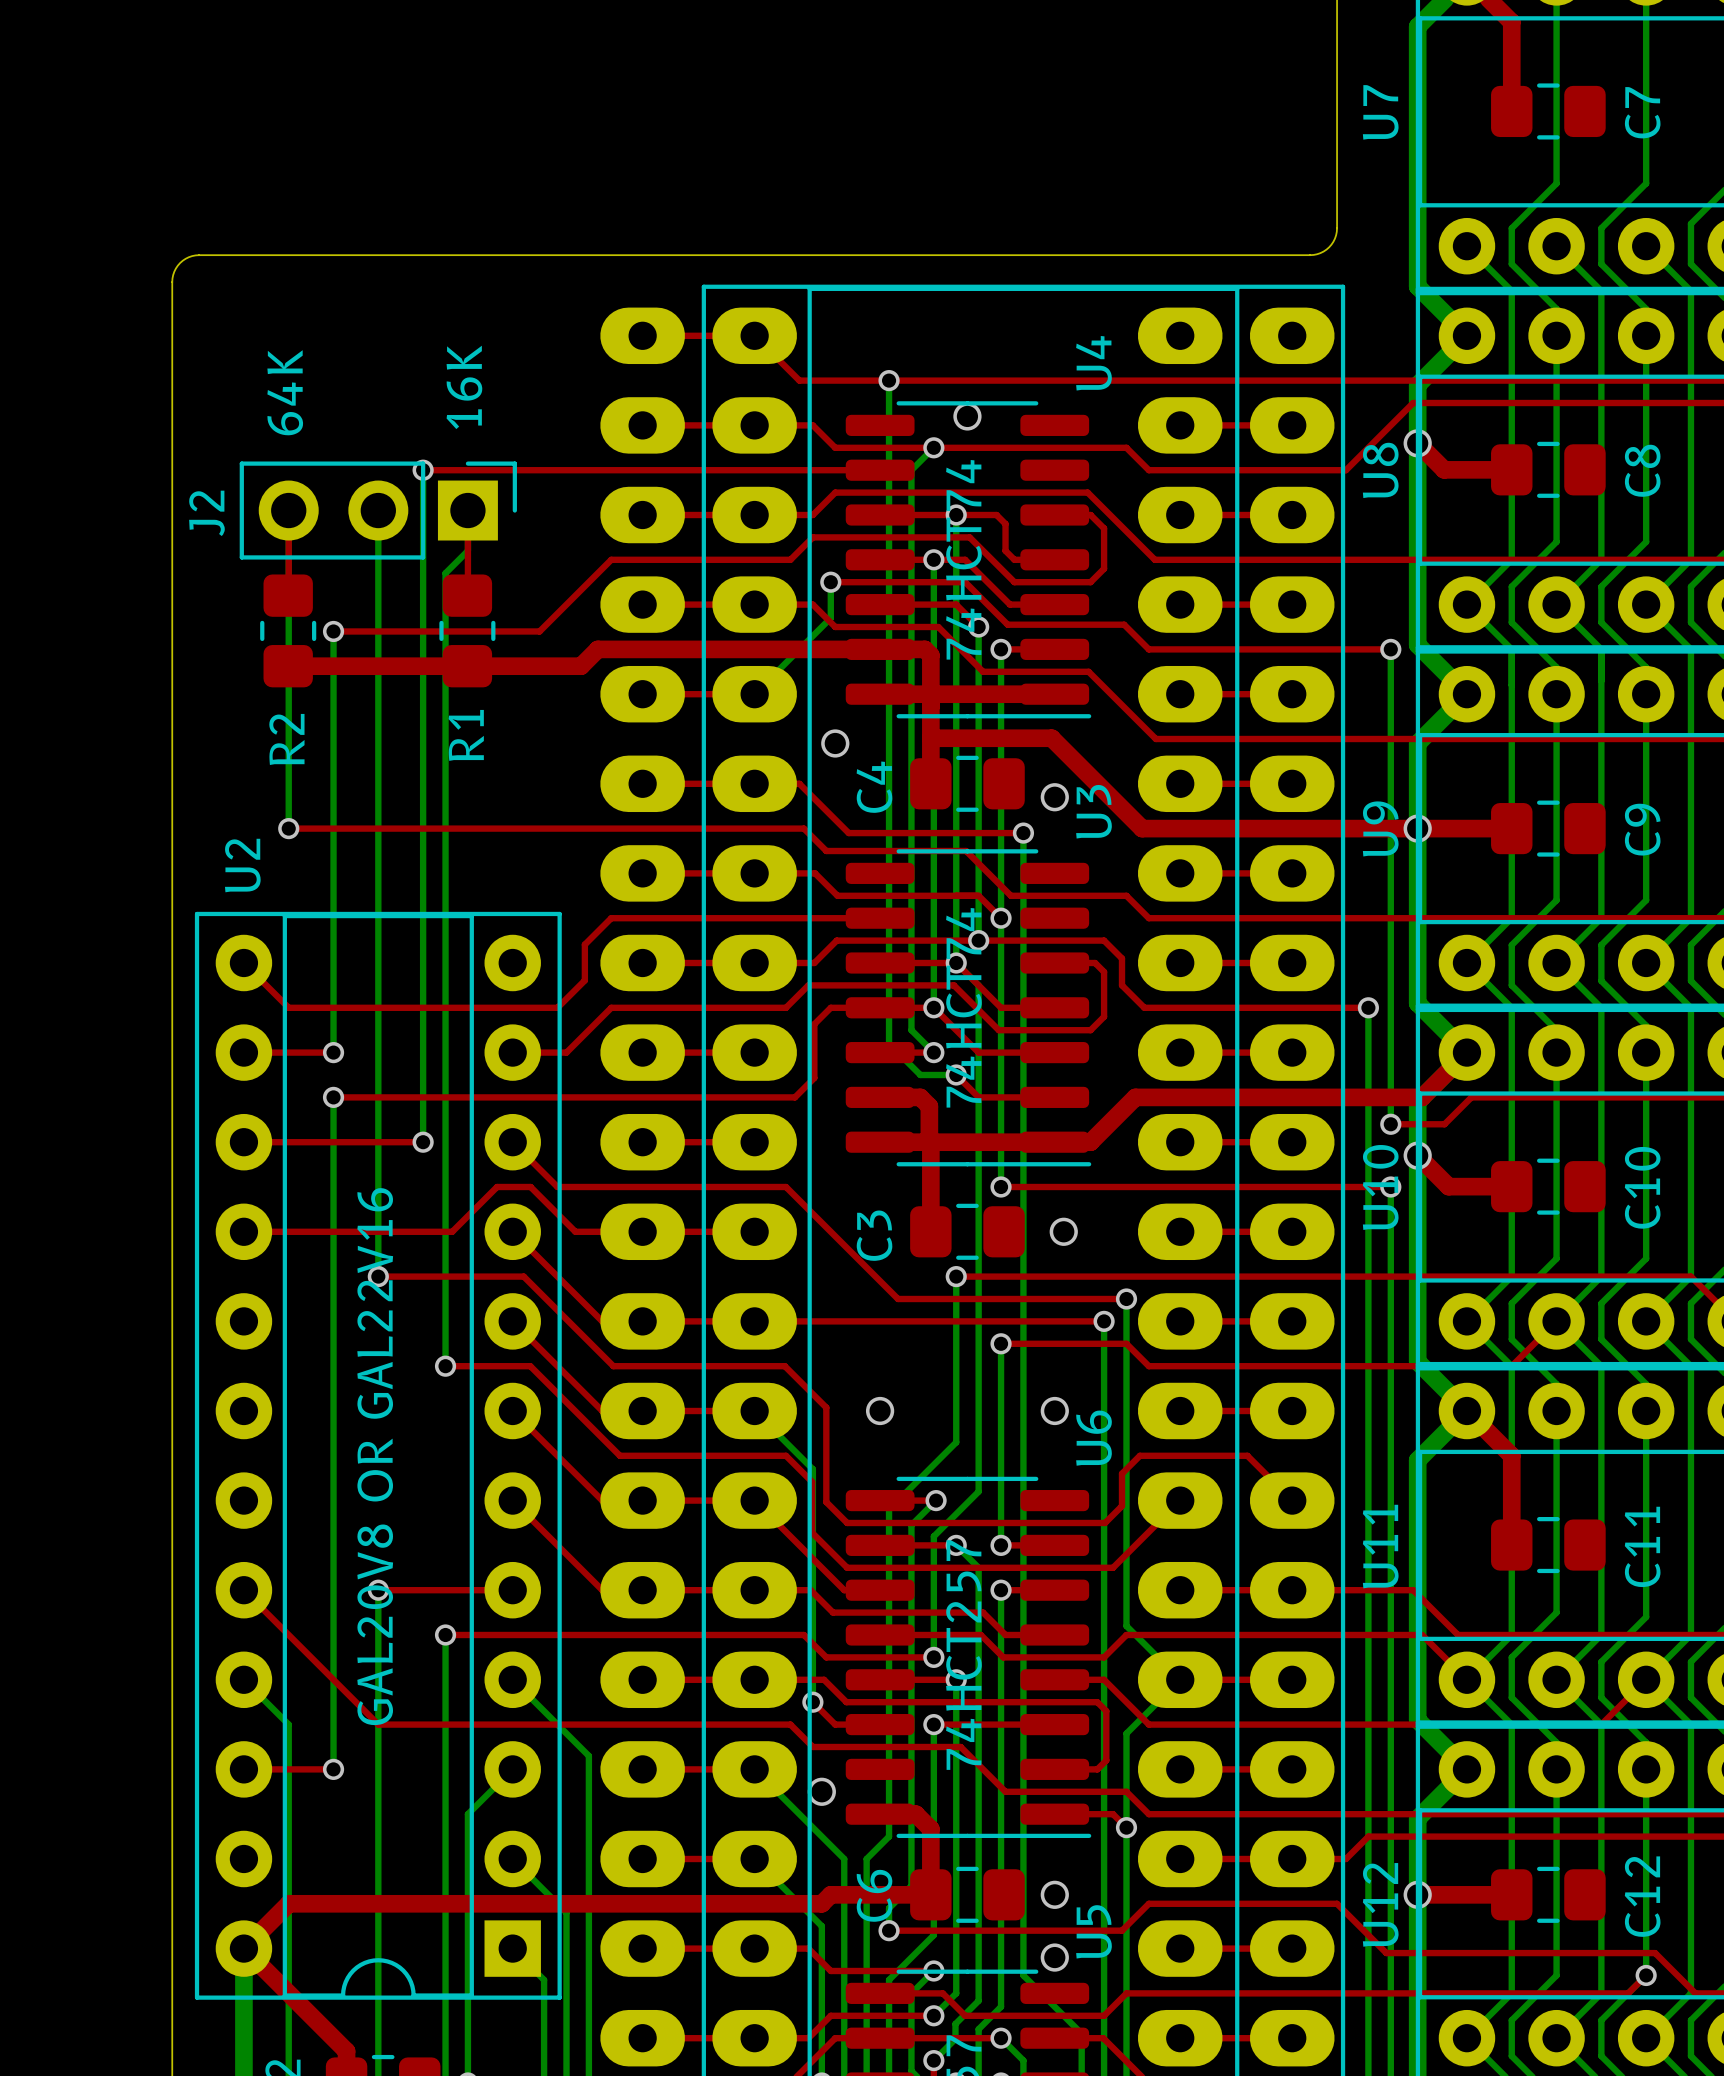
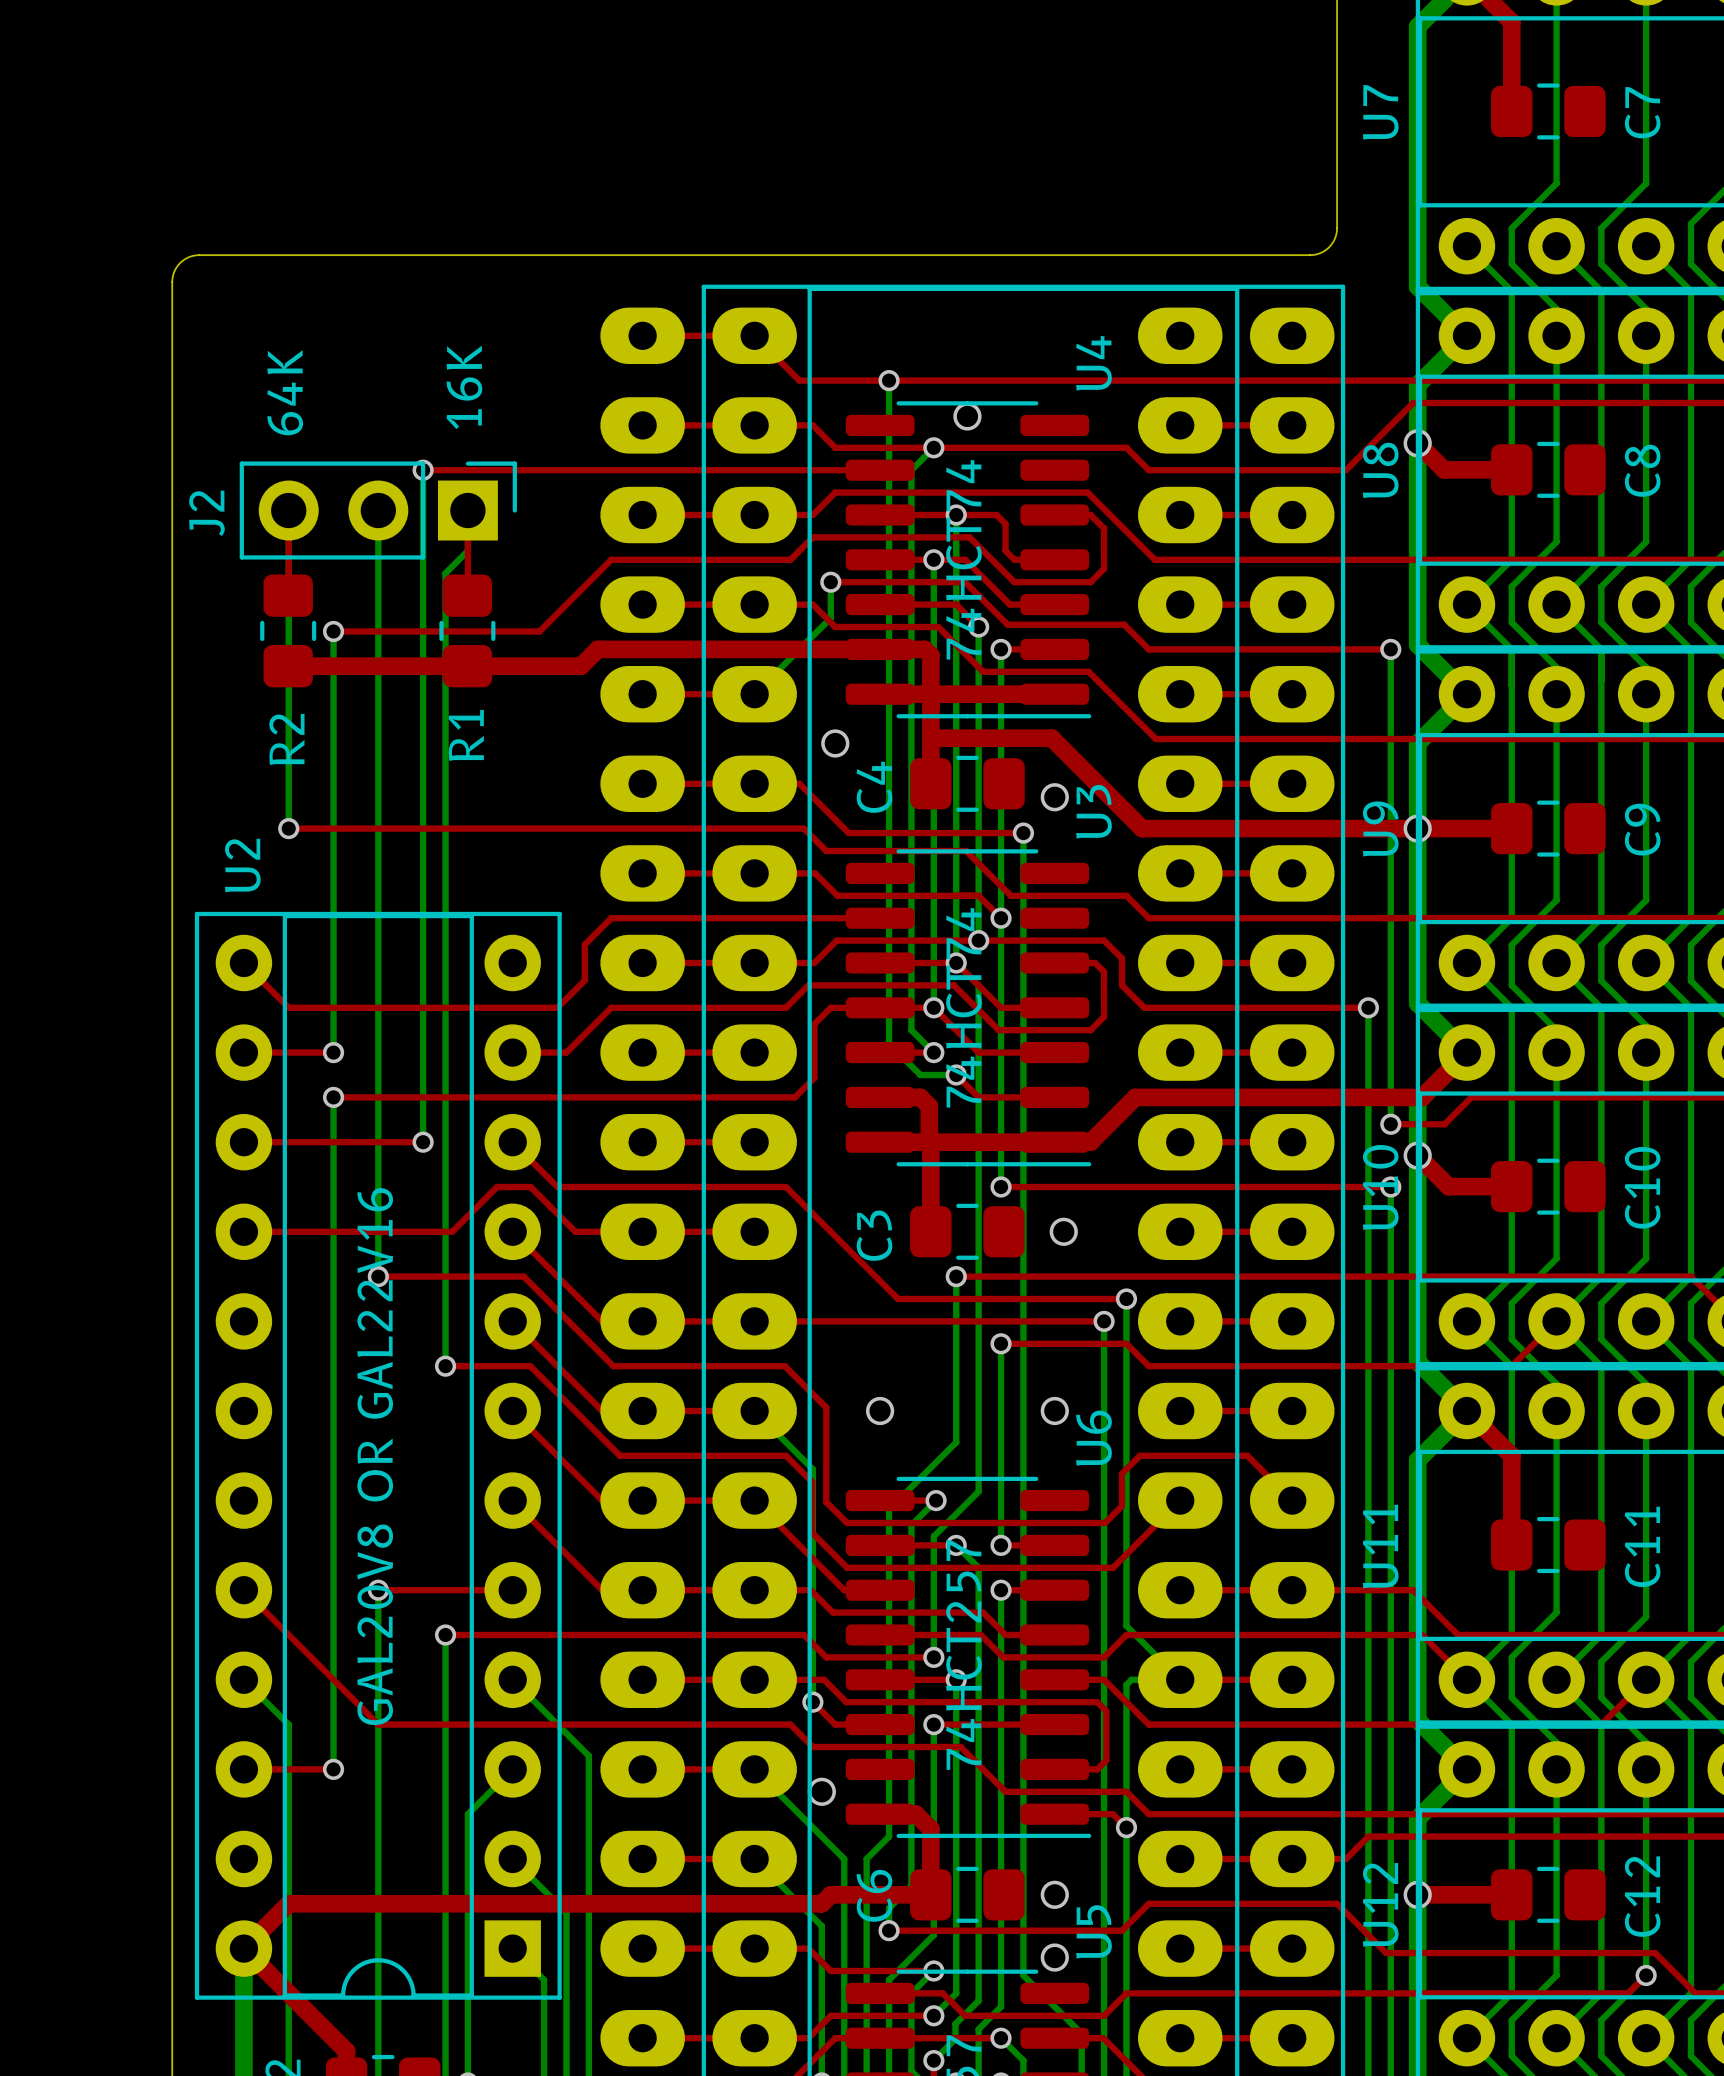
bottom track: (1180, 1679) (1126, 1733) -> (1180, 1679) (1131, 1679) (1126, 1684) (1126, 1733)

